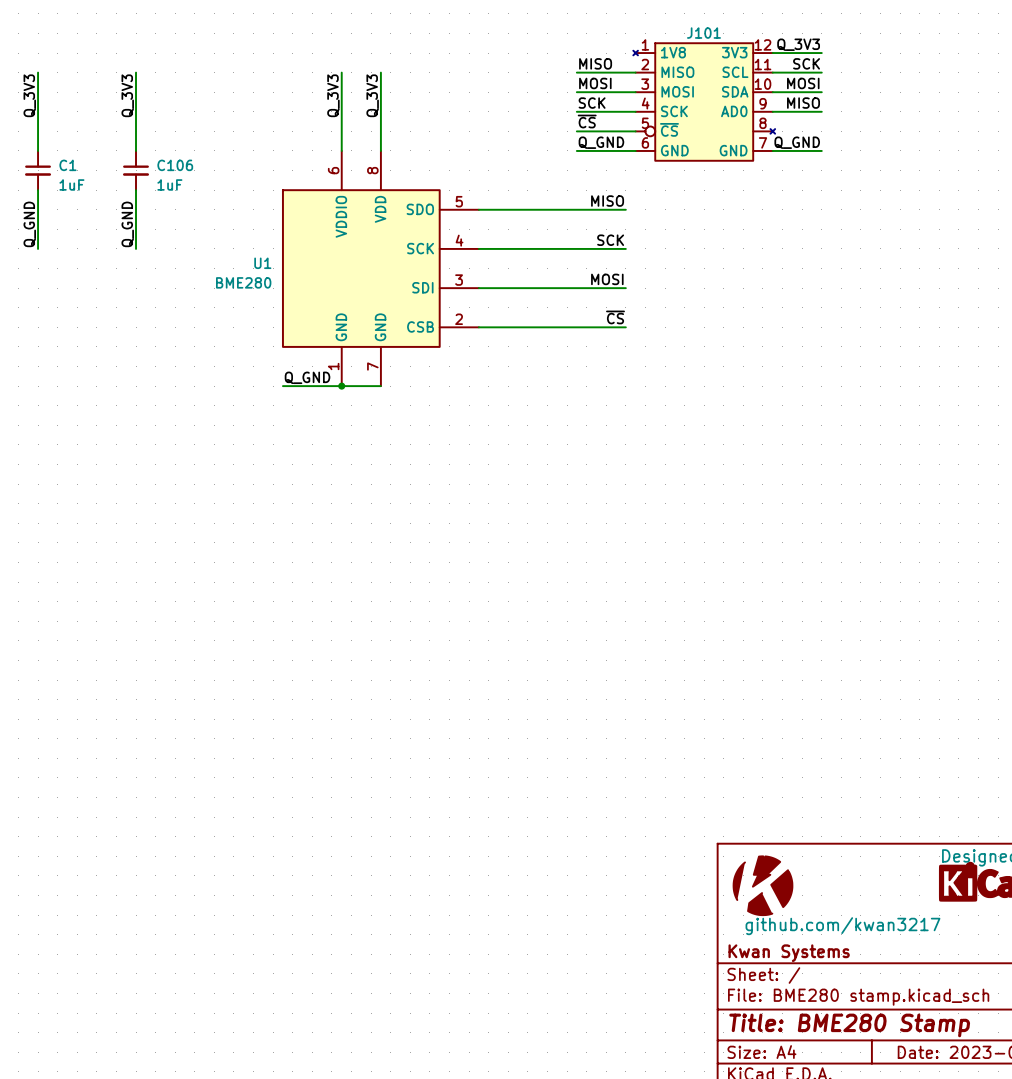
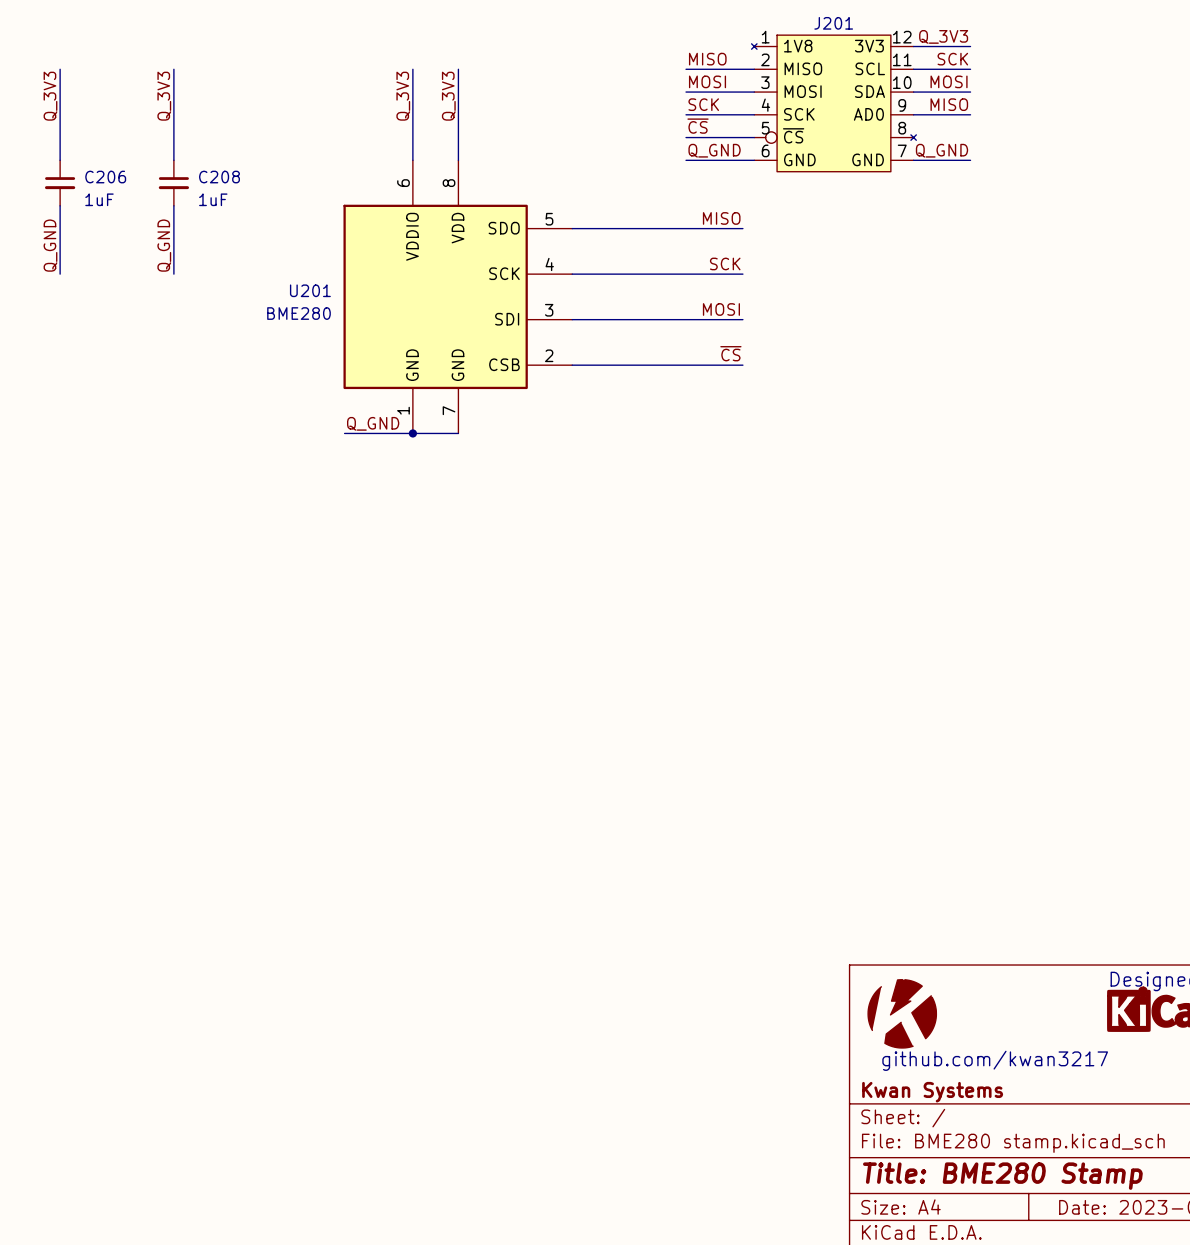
J101 name: J101 (703, 33) -> J201 (833, 23)
C1 name: C1 (67, 165) -> C206 (105, 177)
C106 name: C106 (175, 165) -> C208 (219, 177)
U1 name: U1 (262, 263) -> U201 (310, 290)

